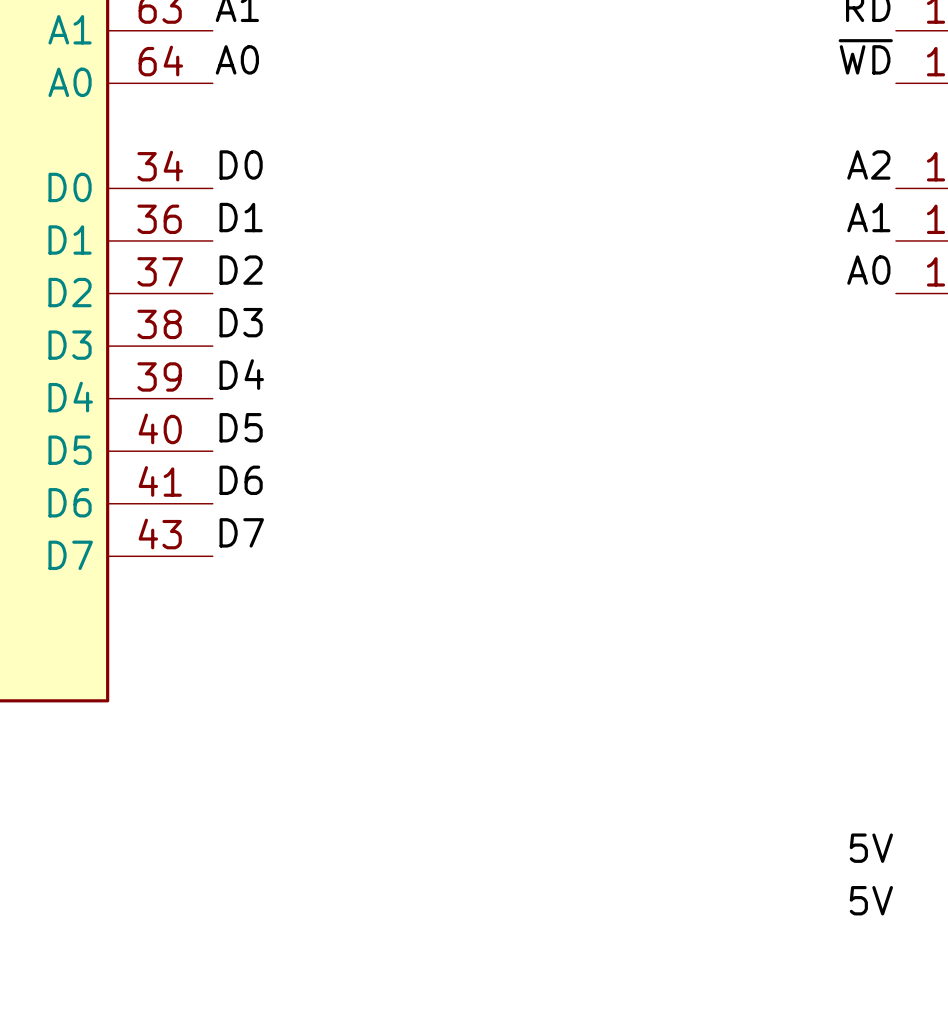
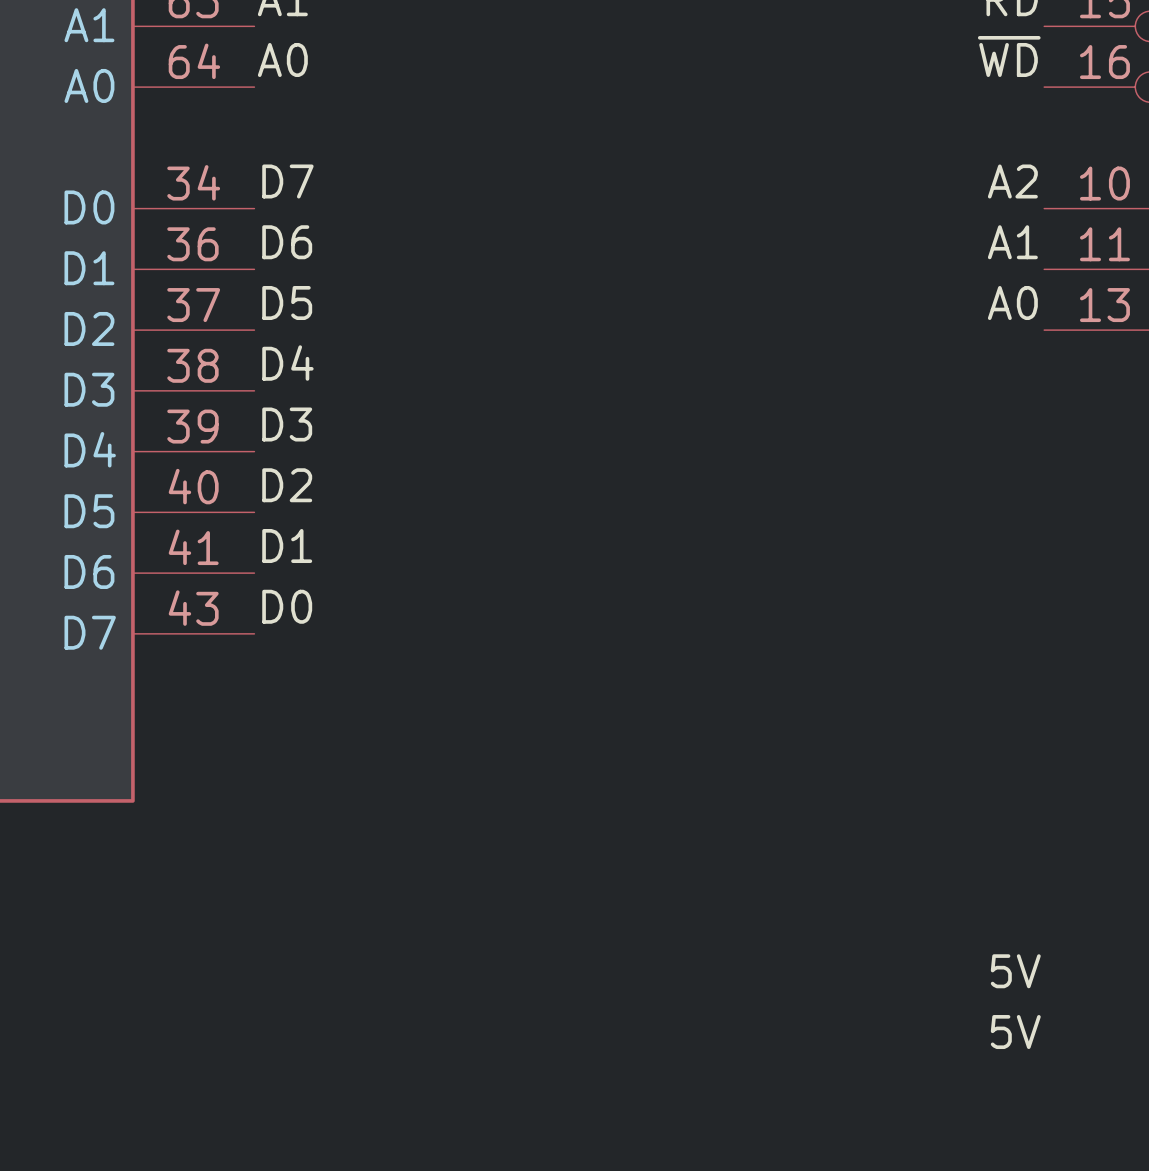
label: D0 (241, 164) -> D7 (287, 181)
label: D1 (241, 217) -> D6 (287, 242)
label: D2 (241, 270) -> D5 (287, 303)
label: D3 (241, 322) -> D4 (287, 363)
label: D4 (241, 374) -> D3 (287, 424)
label: D5 (241, 427) -> D2 (287, 485)
label: D6 (241, 480) -> D1 (287, 546)
label: D7 (241, 532) -> D0 (287, 606)

